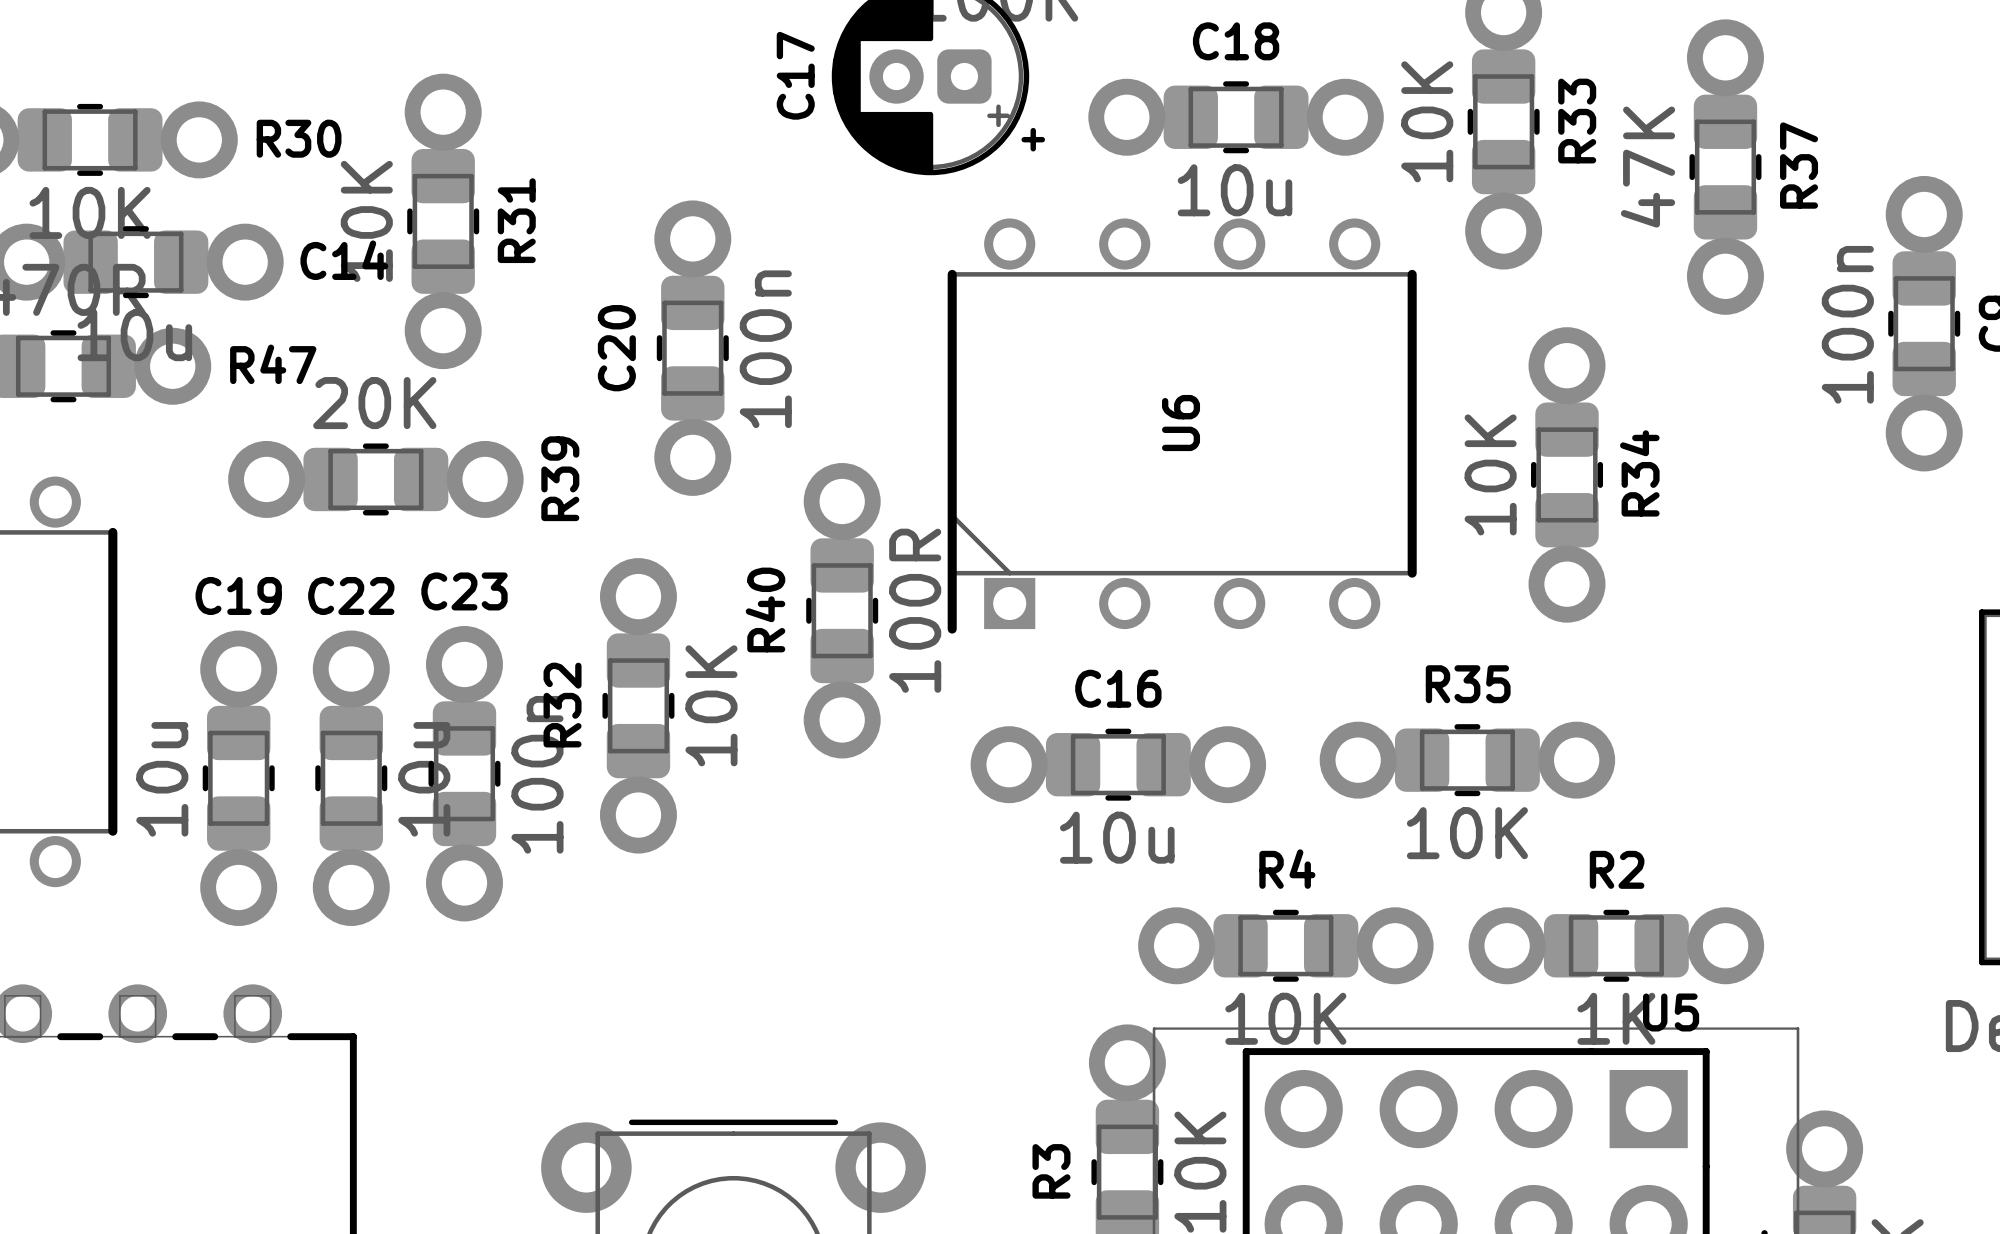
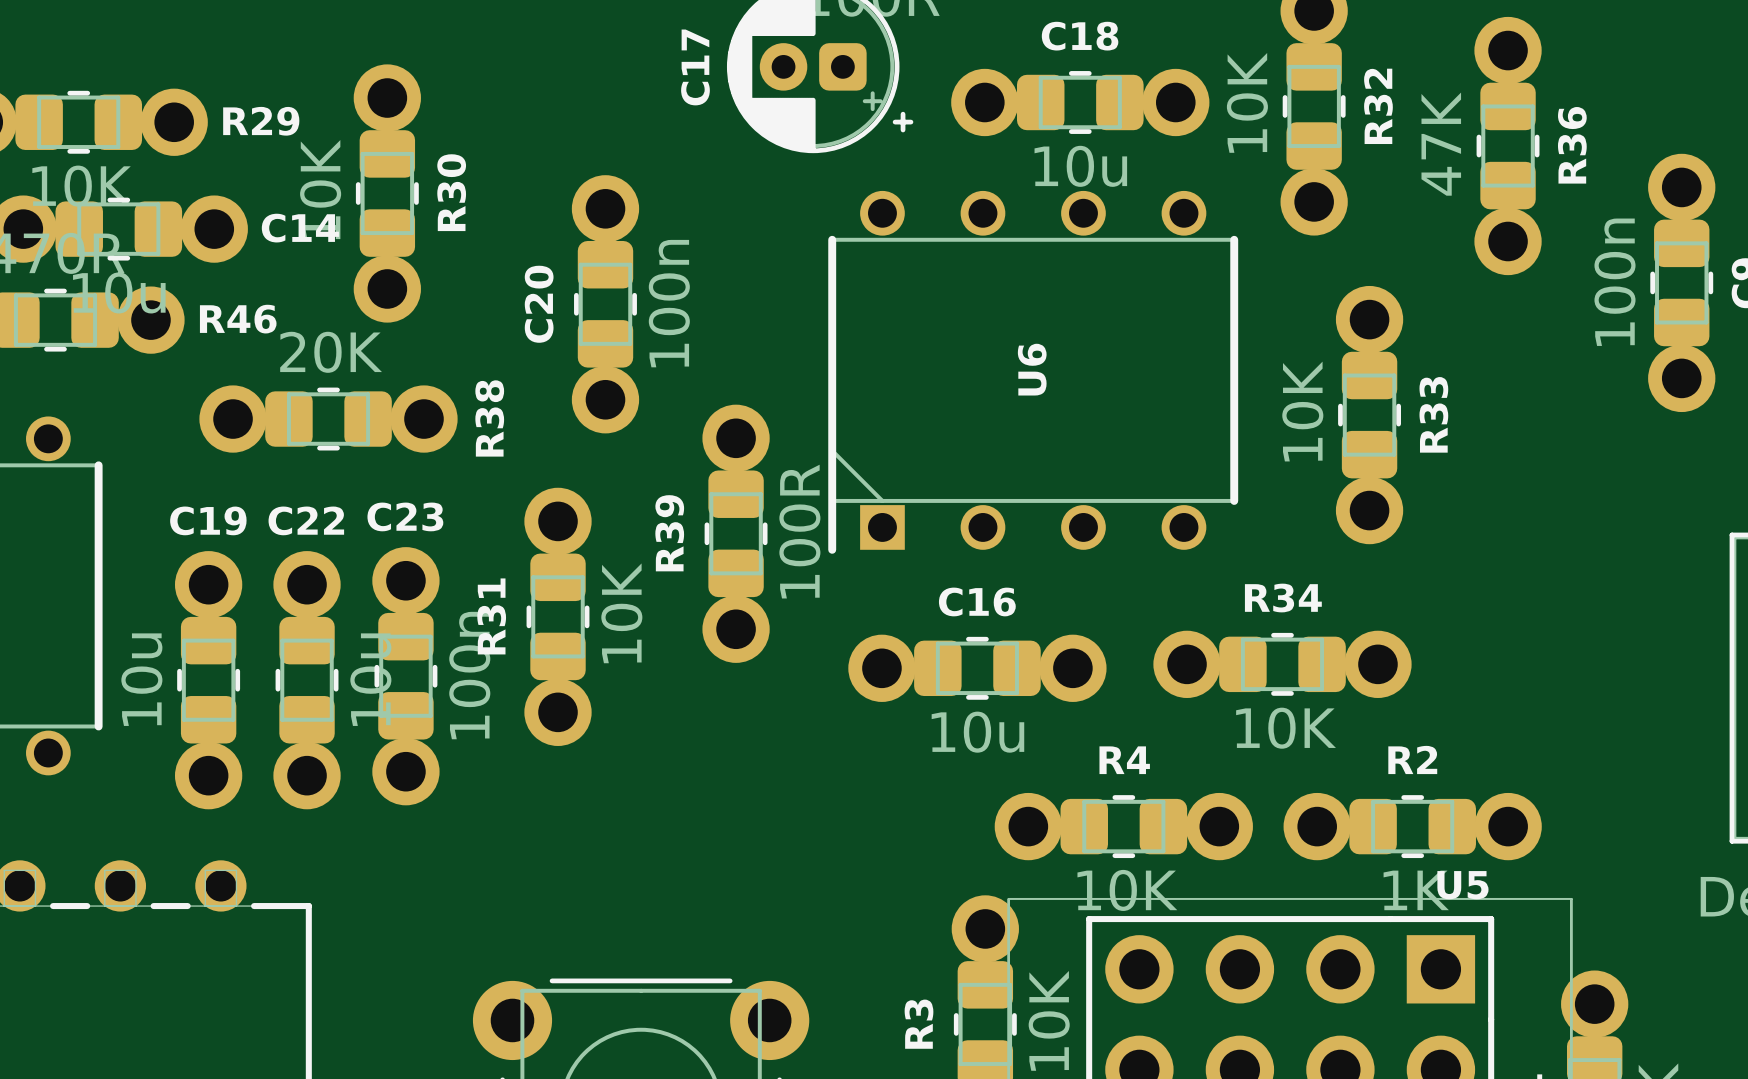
R33 name: R33 (1577, 121) -> R32 (1378, 106)
R30 name: R30 (299, 138) -> R29 (261, 121)
R37 name: R37 (1799, 165) -> R36 (1572, 145)
R31 name: R31 (516, 220) -> R30 (451, 192)
R47 name: R47 (273, 364) -> R46 (238, 319)
R34 name: R34 (1639, 473) -> R33 (1433, 414)
R39 name: R39 (560, 478) -> R38 (489, 418)
R40 name: R40 (765, 609) -> R39 (669, 533)
R35 name: R35 (1468, 684) -> R34 (1283, 598)
R32 name: R32 (562, 705) -> R31 (491, 616)

